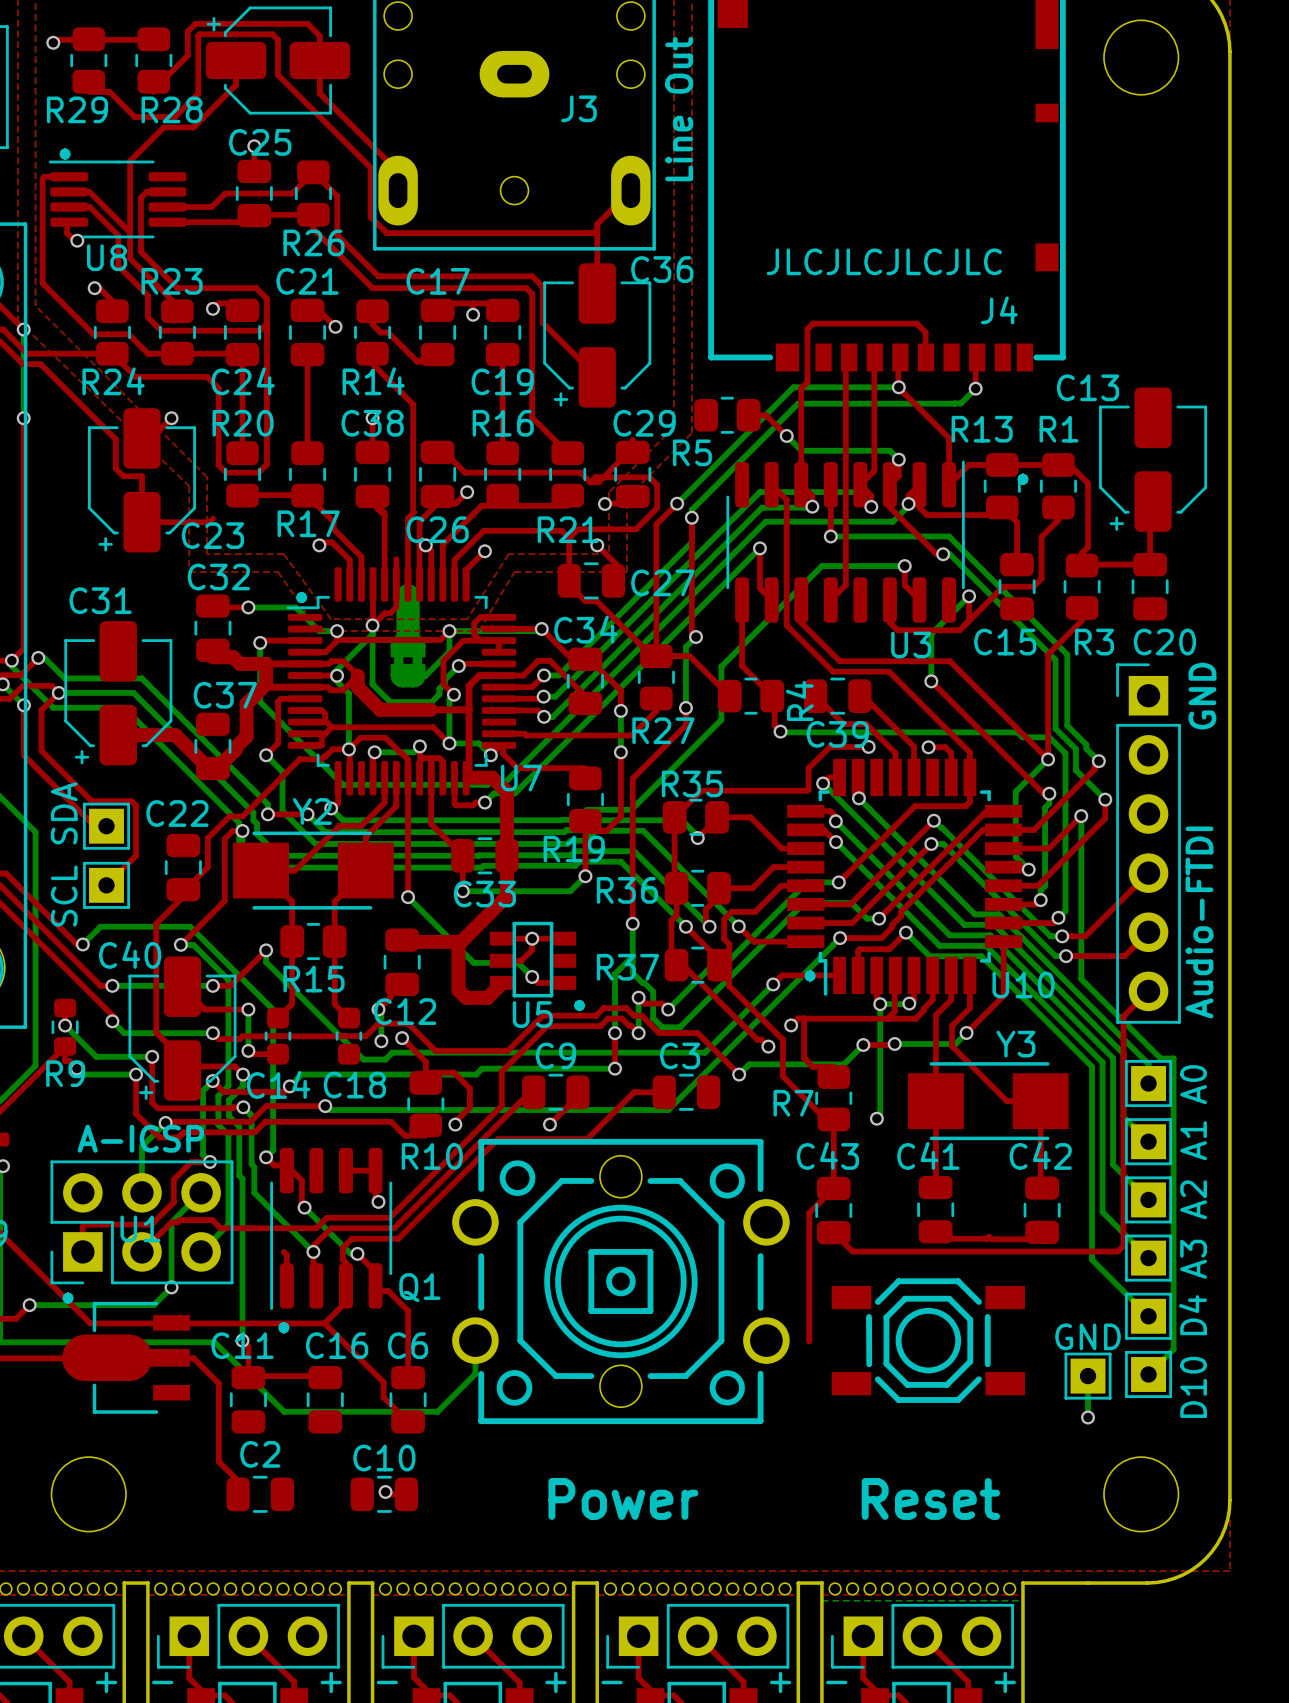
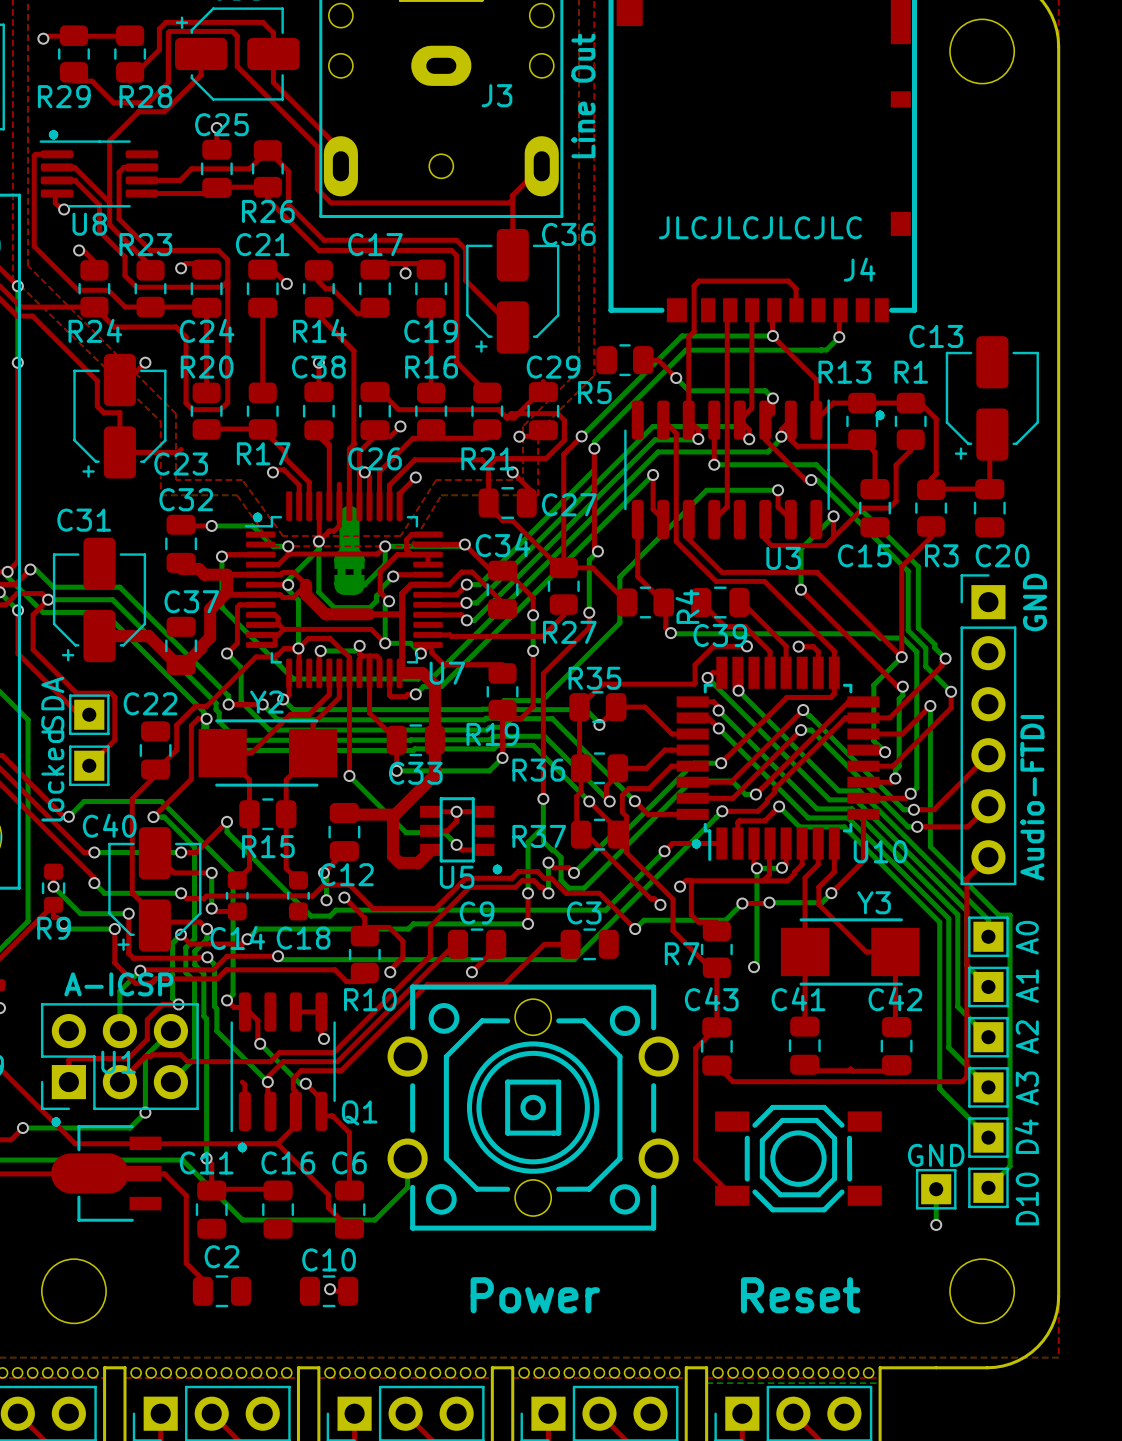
SCL name: SCL (64, 896) -> locked (52, 775)
part rotation: 0° (928, 1340) -> 180° (798, 1158)
top track: none -> (695, 1159) (732, 1195)

